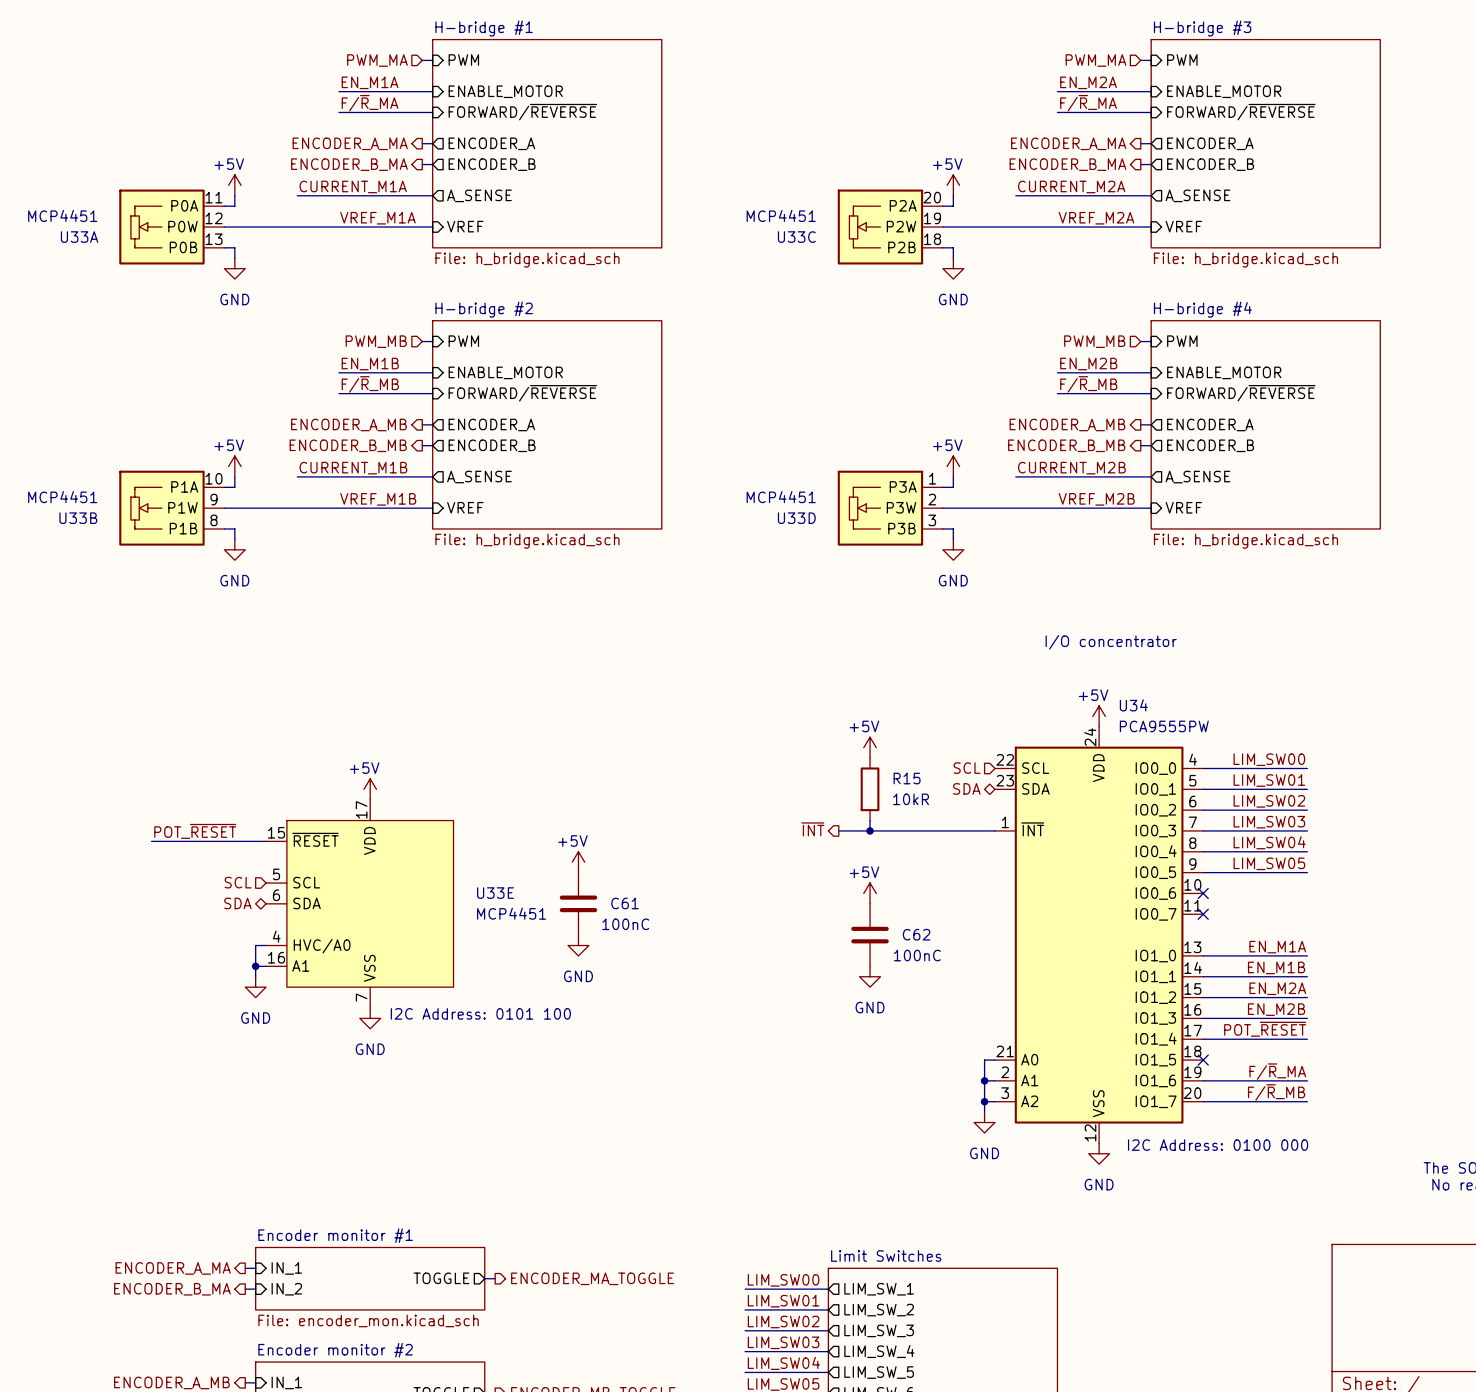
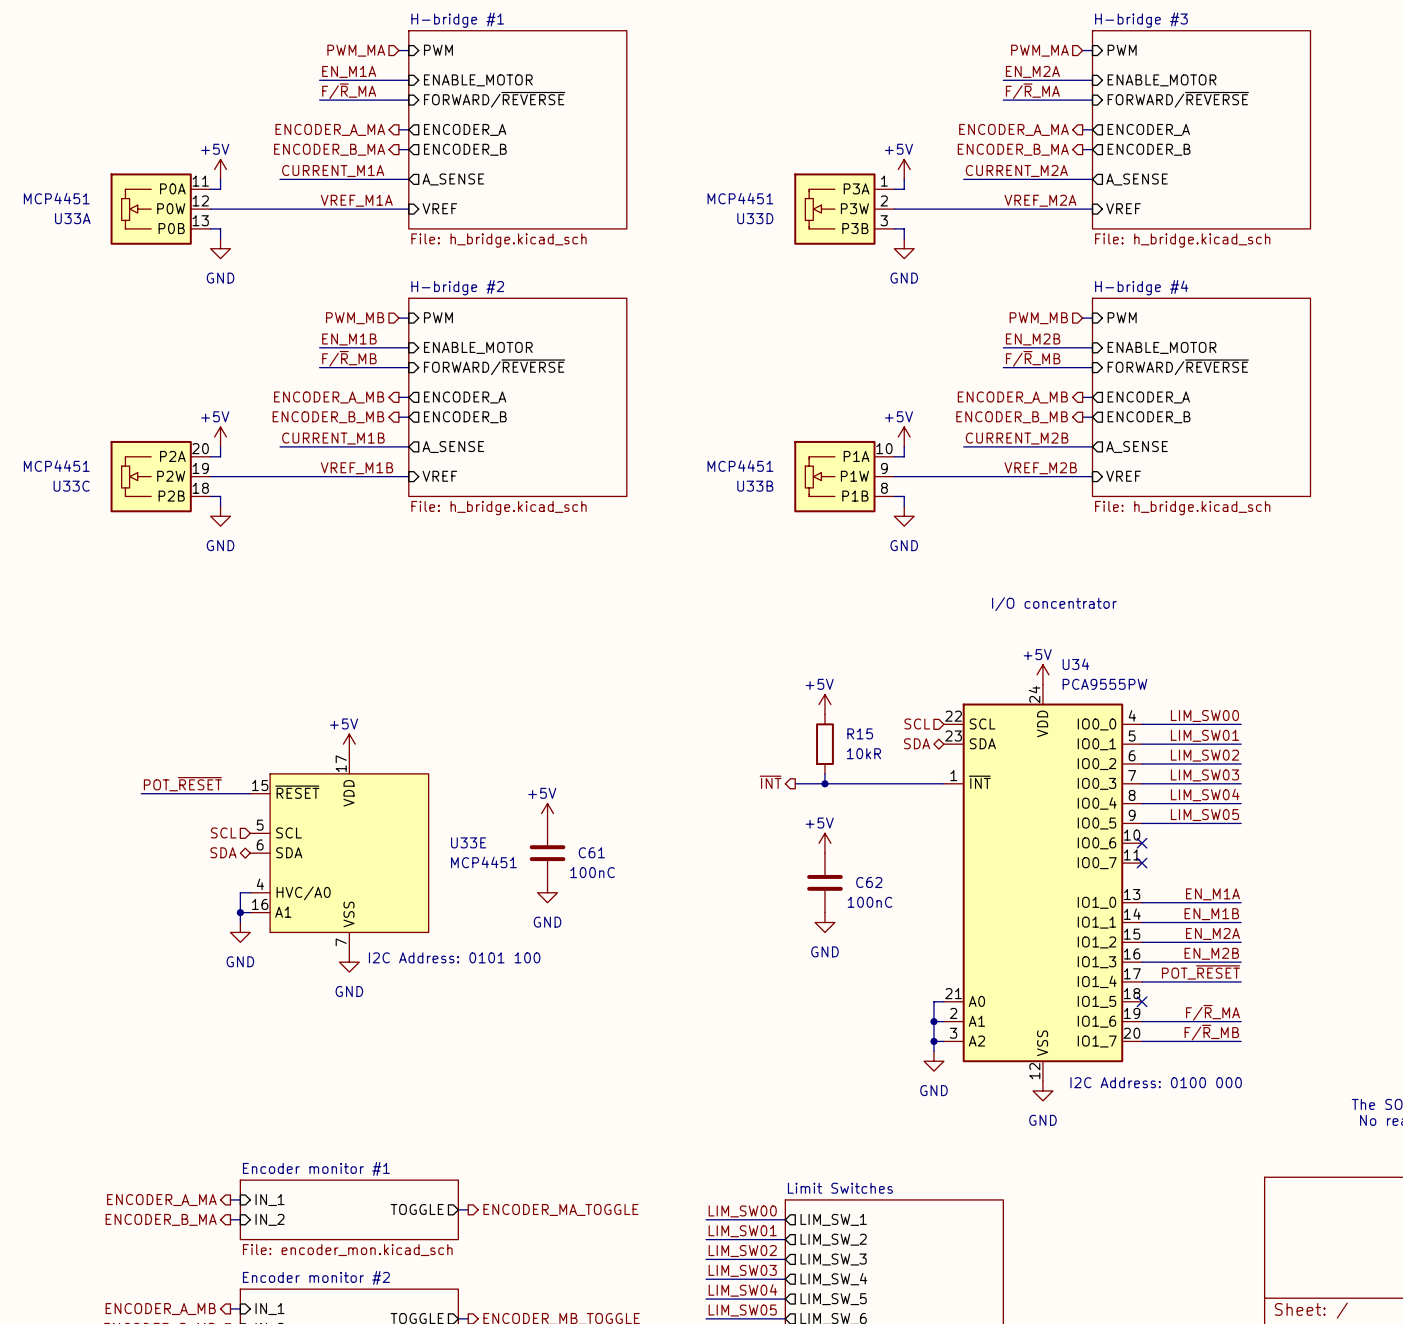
U33C position: (890, 227) -> (160, 476)
U33B position: (171, 508) -> (844, 476)
U33D position: (890, 508) -> (844, 209)

